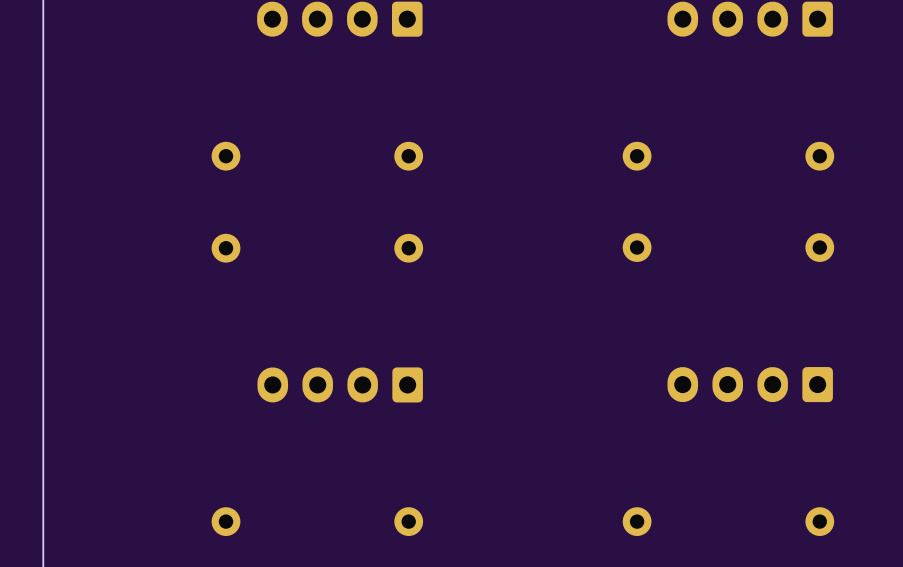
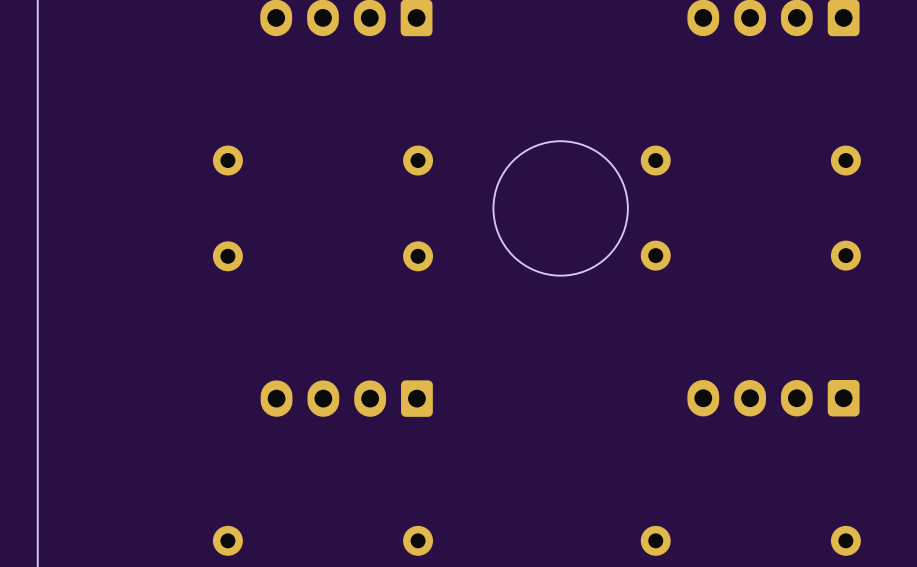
round board edge: none -> [492, 140, 629, 277]

